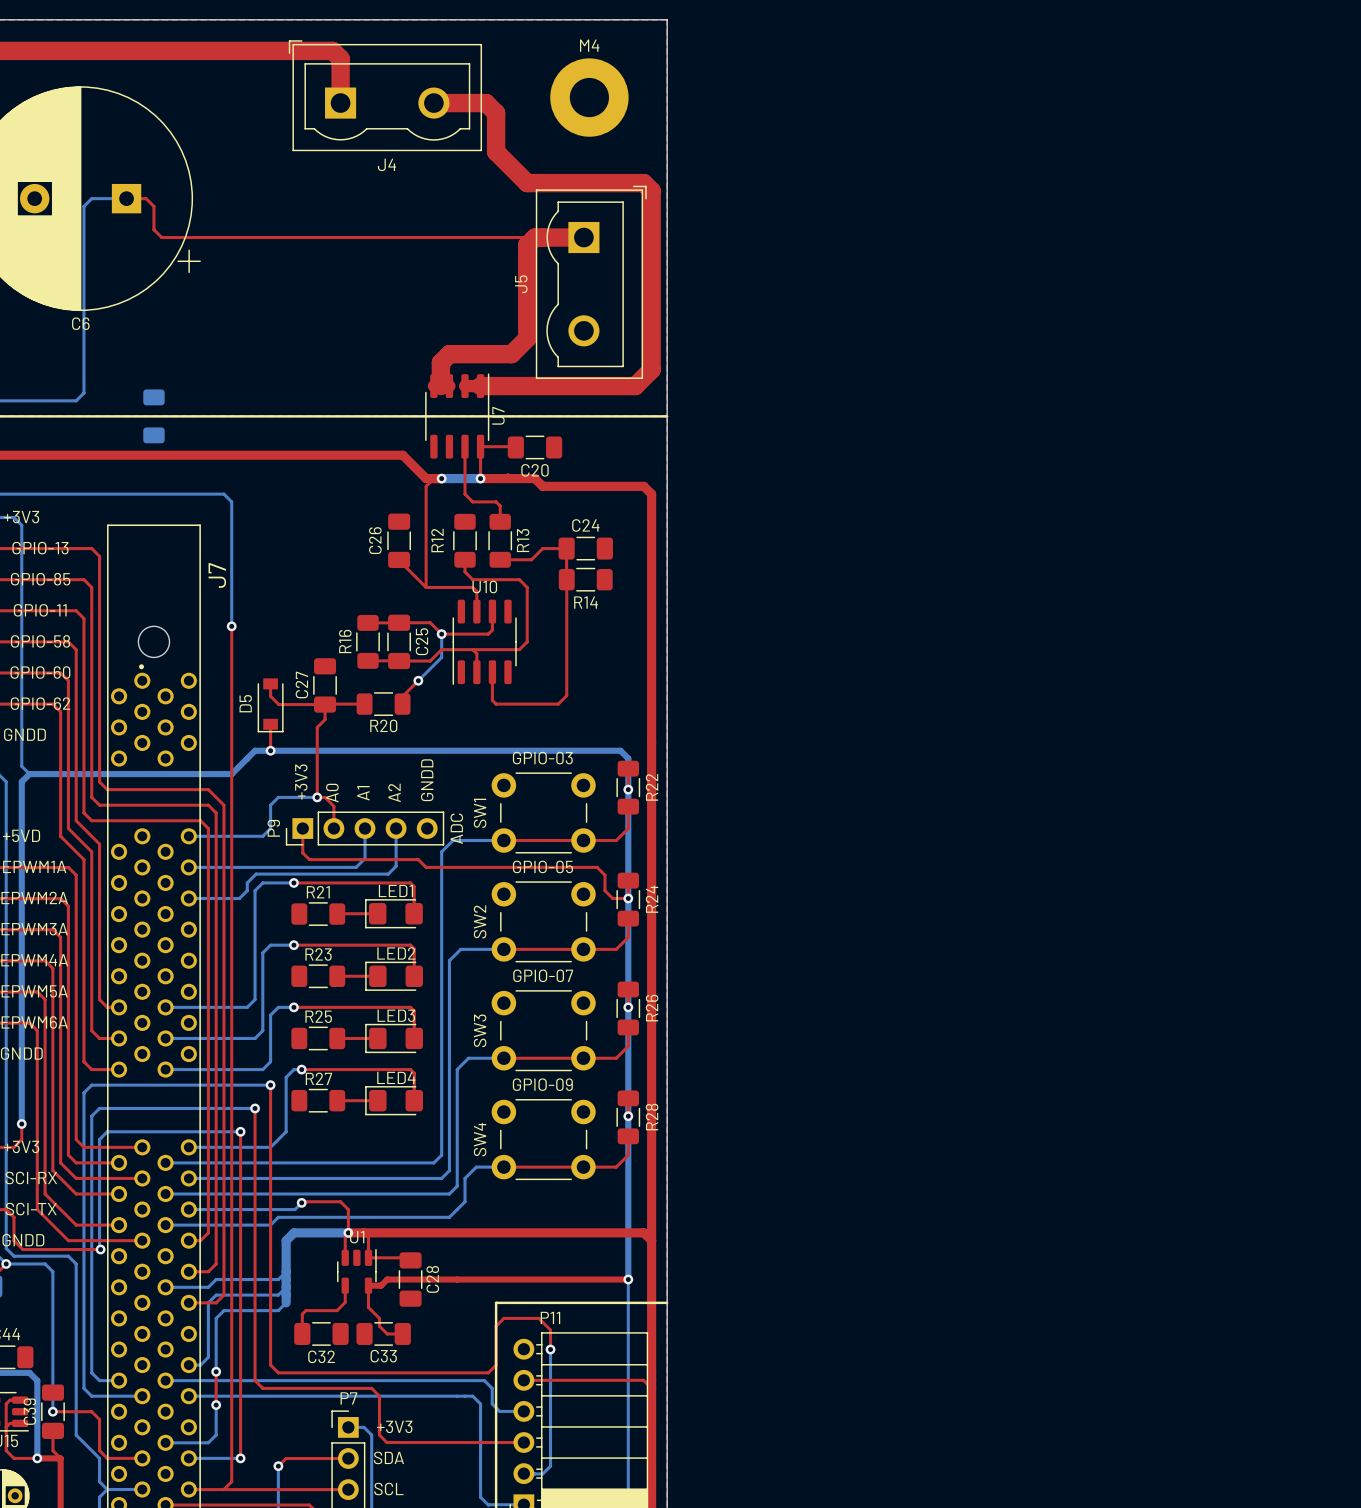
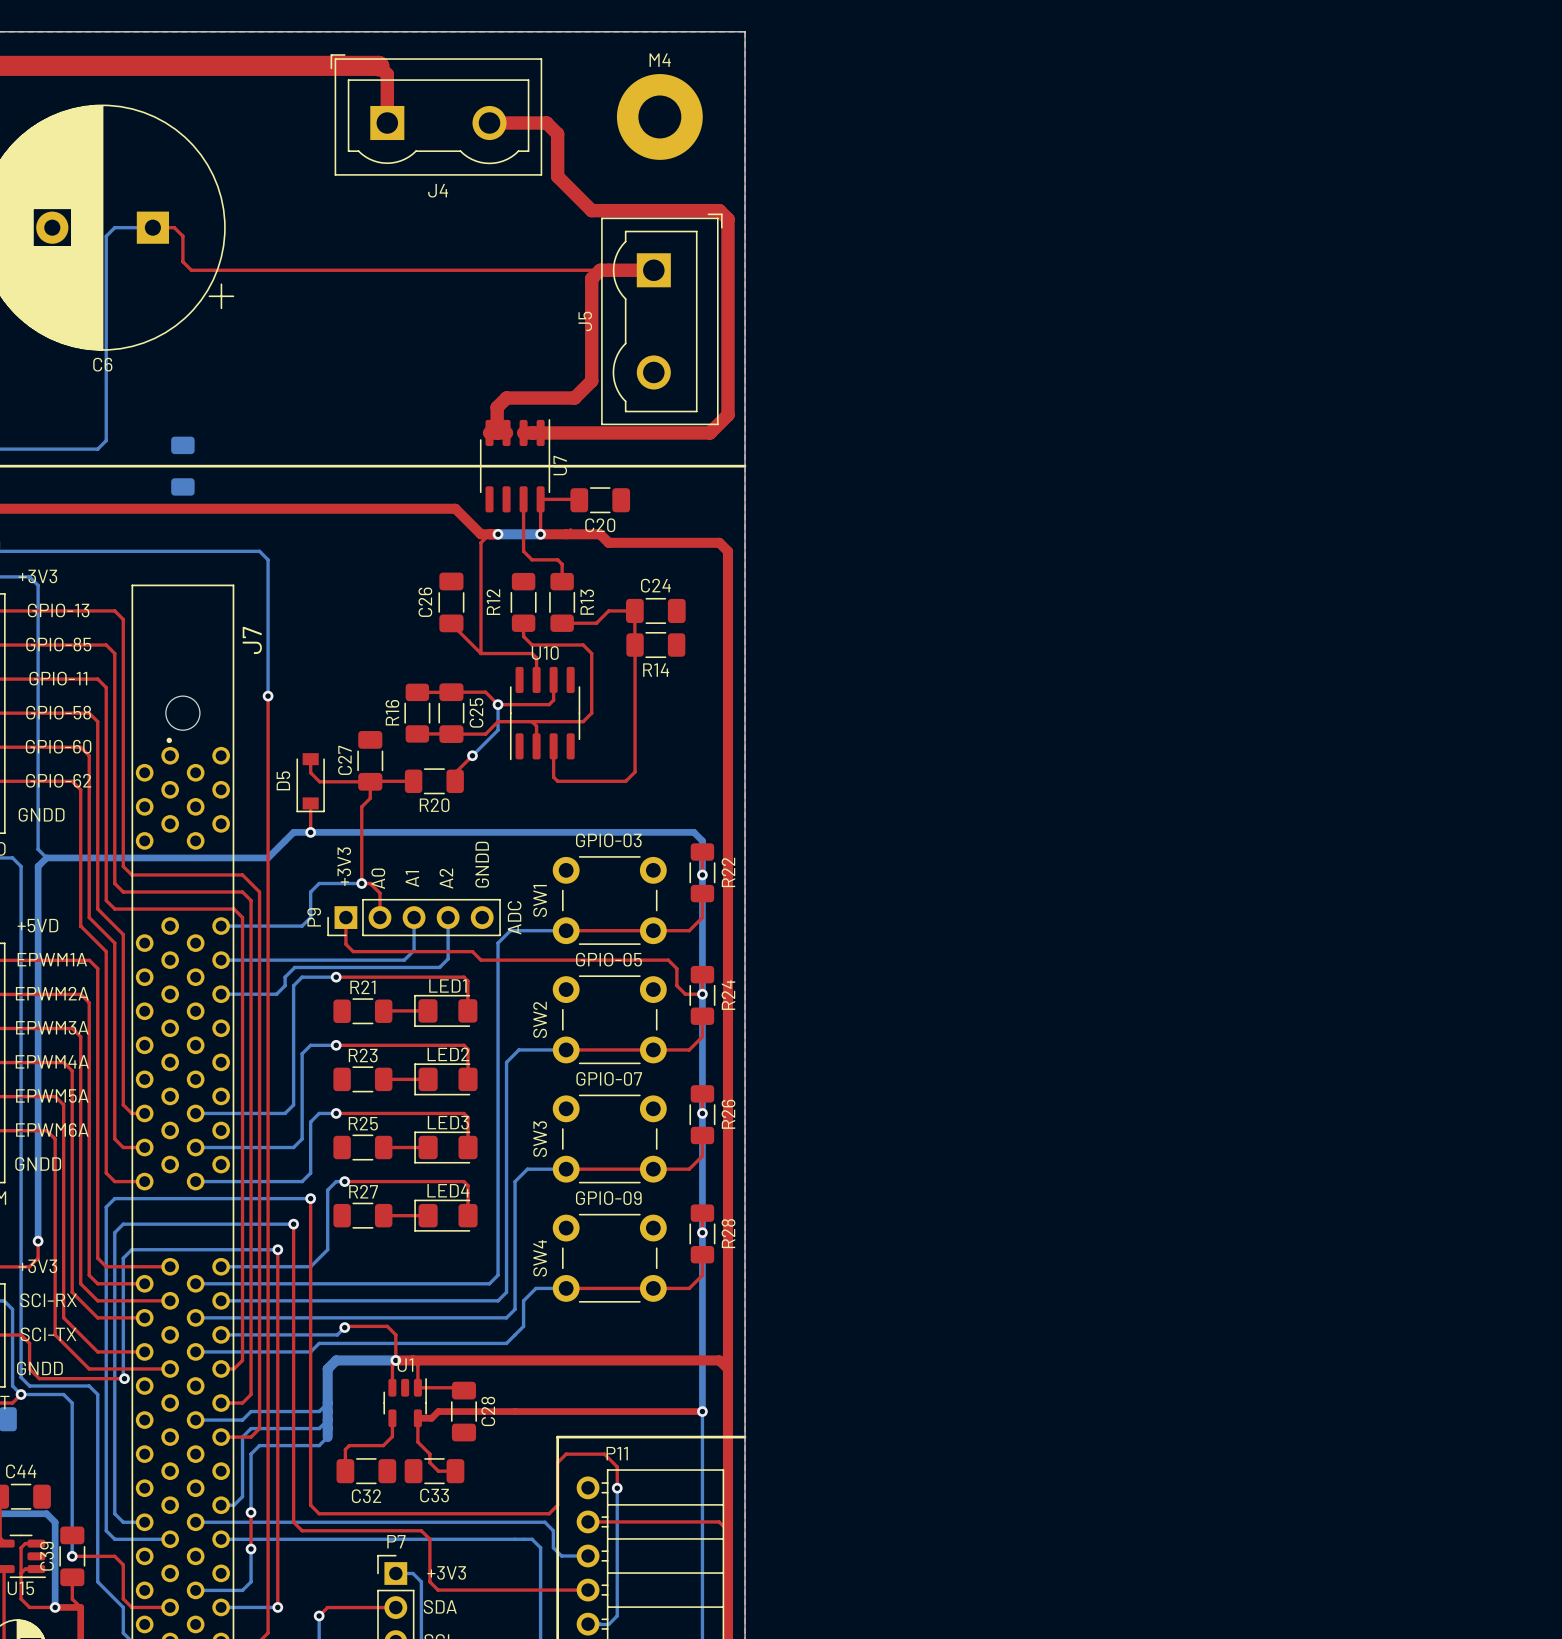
top track width: thick (333, 51) (340, 58) (340, 103) -> thin (379, 66) (387, 74) (387, 123)
top track width: thick (433, 103) (486, 103) (496, 113) (496, 151) (527, 183) (643, 183) (651, 190) (651, 369) (635, 386) (480, 386) -> thin (489, 123) (546, 123) (557, 134) (557, 176) (591, 210) (719, 210) (727, 219) (727, 415) (710, 432) (540, 432)
top track width: thick (583, 237) (534, 237) (527, 245) (527, 338) (511, 354) (449, 354) (440, 362) (440, 386) -> thin (653, 270) (600, 270) (591, 278) (591, 380) (574, 398) (506, 398) (497, 407) (497, 432)

